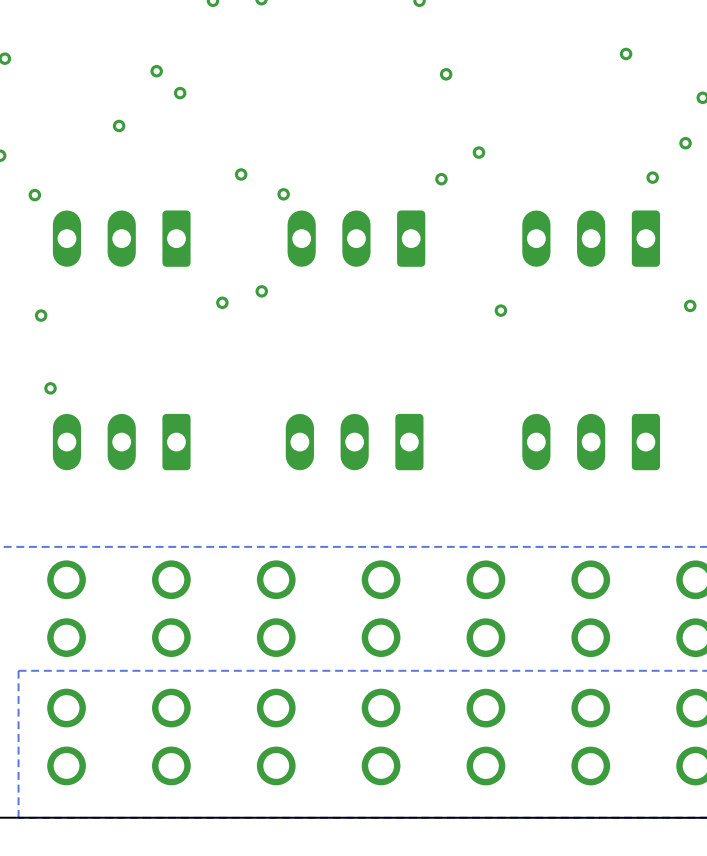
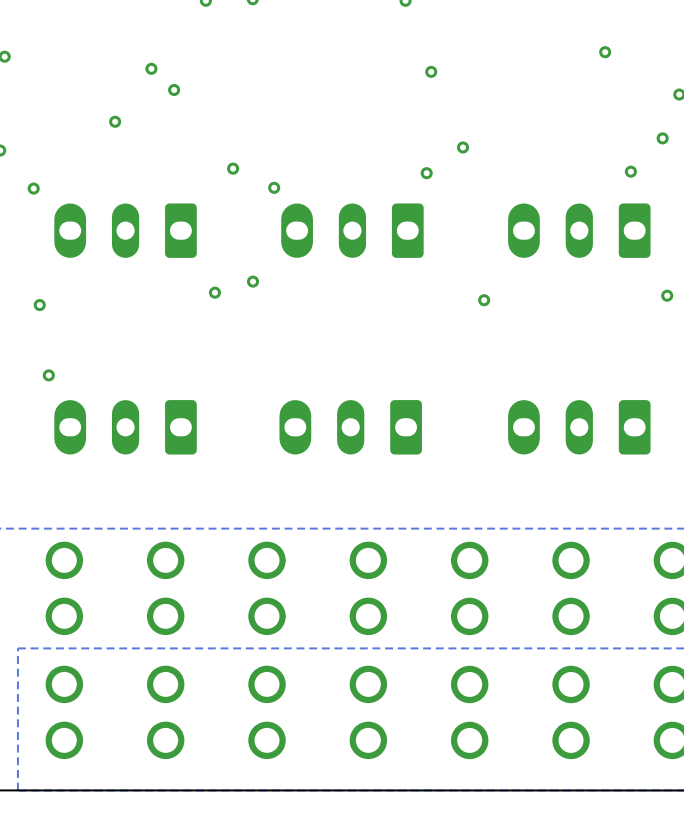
part footprint: [52, 210, 191, 267] -> [54, 203, 197, 258]
part footprint: [287, 210, 426, 267] -> [281, 203, 424, 258]
part footprint: [522, 210, 660, 267] -> [508, 203, 651, 258]
part footprint: [52, 413, 191, 471] -> [54, 400, 197, 455]
part footprint: [285, 413, 424, 471] -> [279, 400, 422, 455]
part footprint: [522, 413, 660, 471] -> [508, 400, 651, 455]

